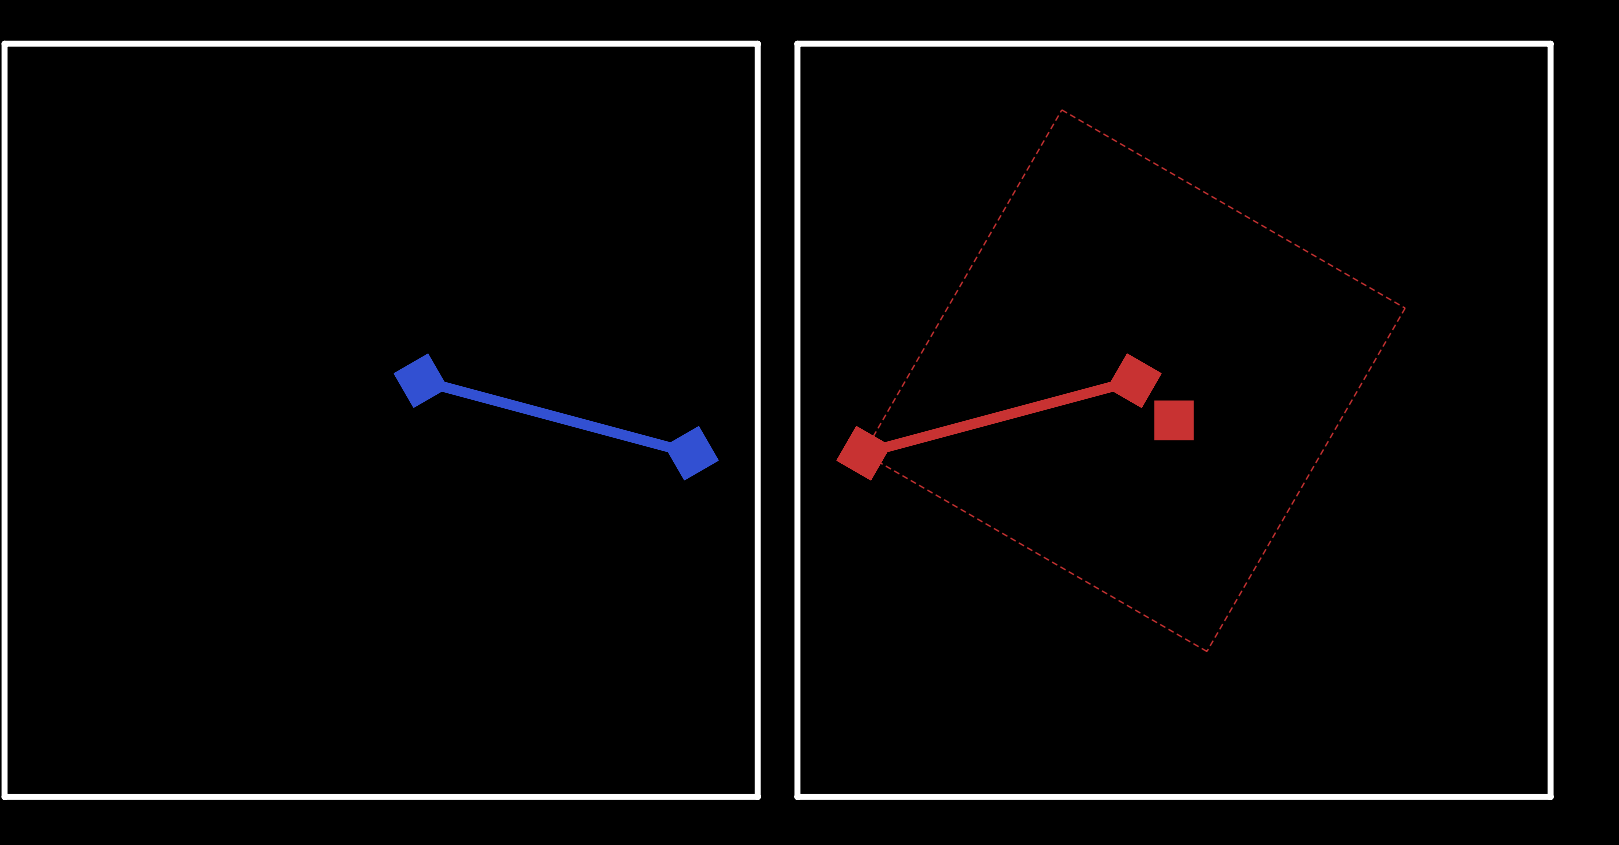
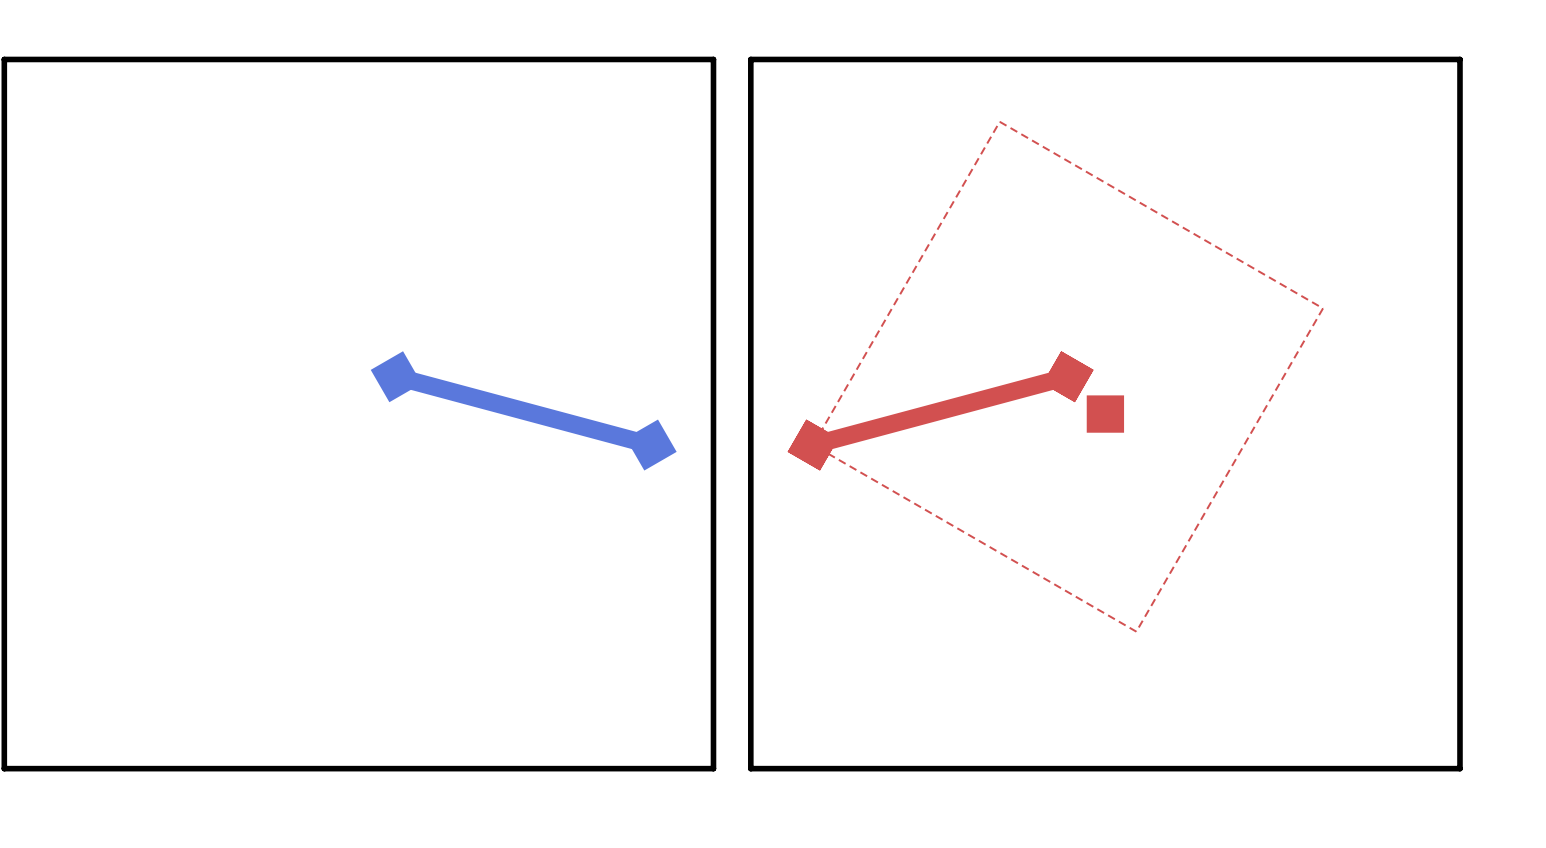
bottom track width: thin (420, 380) (691, 453) -> thick (396, 376) (651, 445)
top track width: thin (1134, 380) (863, 453) -> thick (1068, 376) (813, 445)

